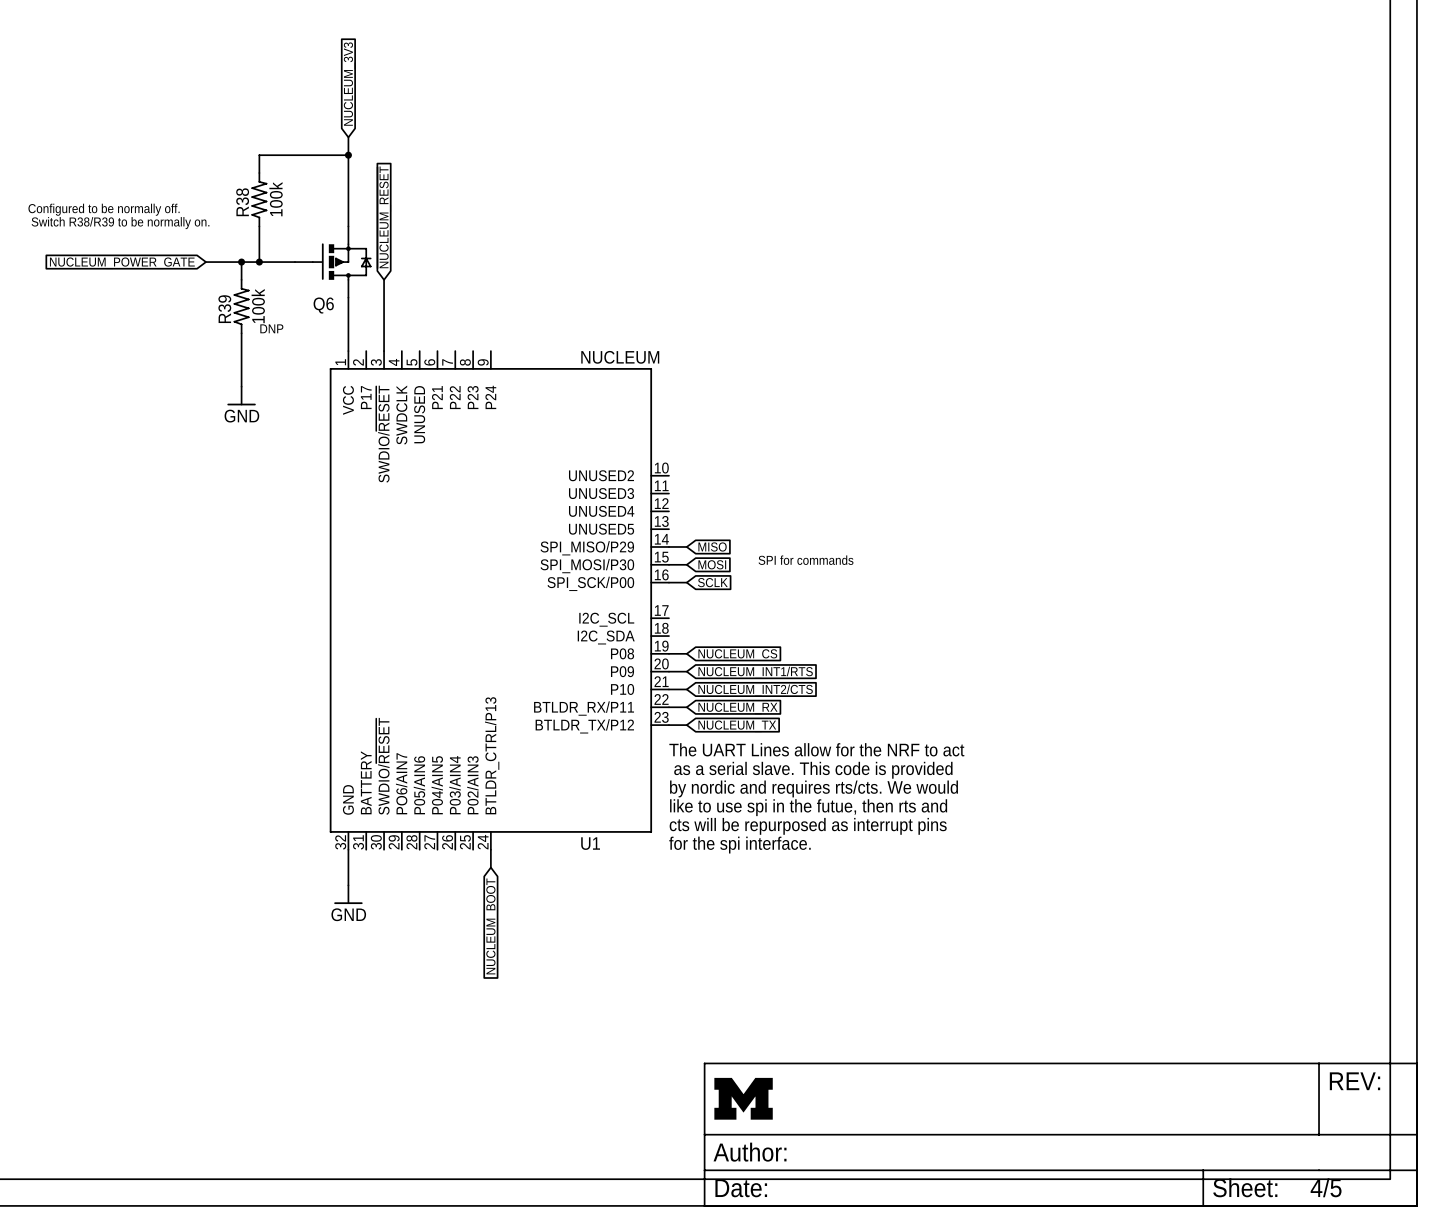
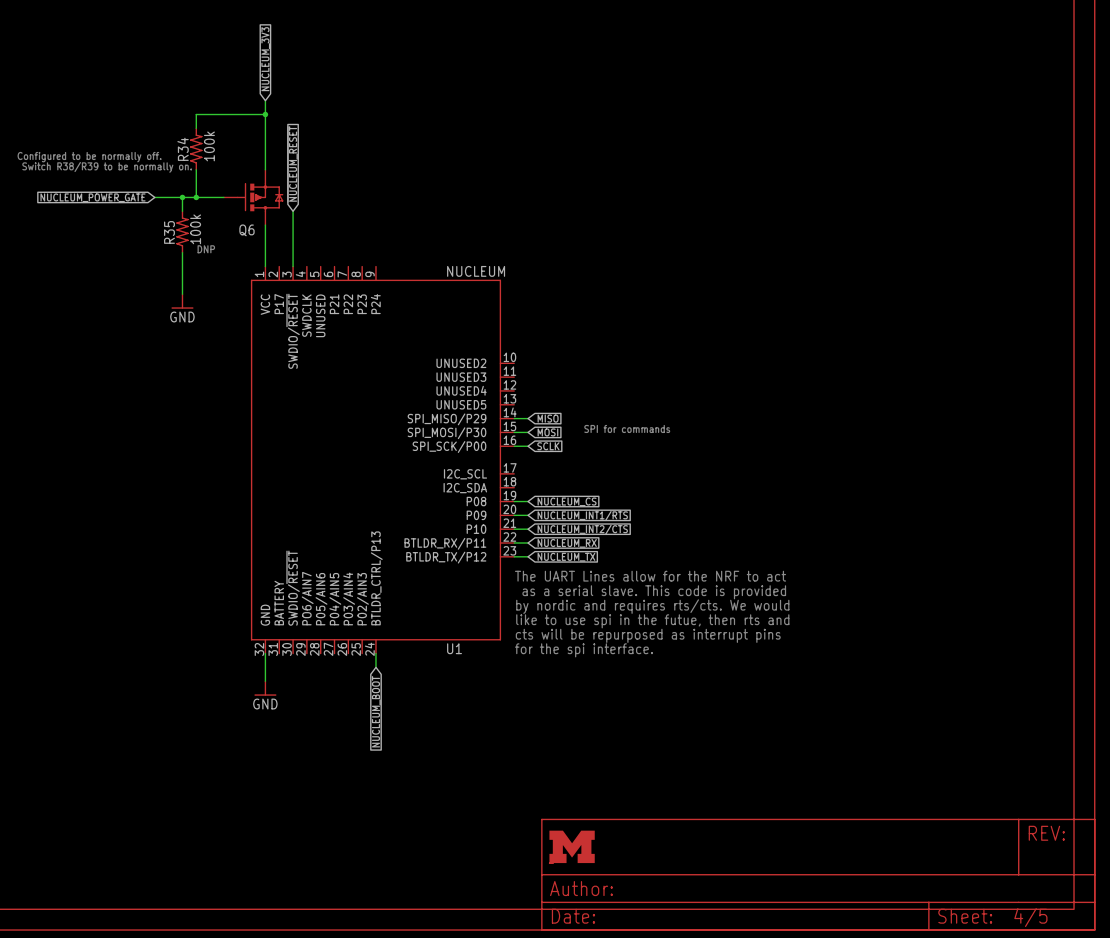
R38 name: R38 (242, 202) -> R34 (183, 149)
R39 name: R39 (224, 309) -> R35 (169, 232)

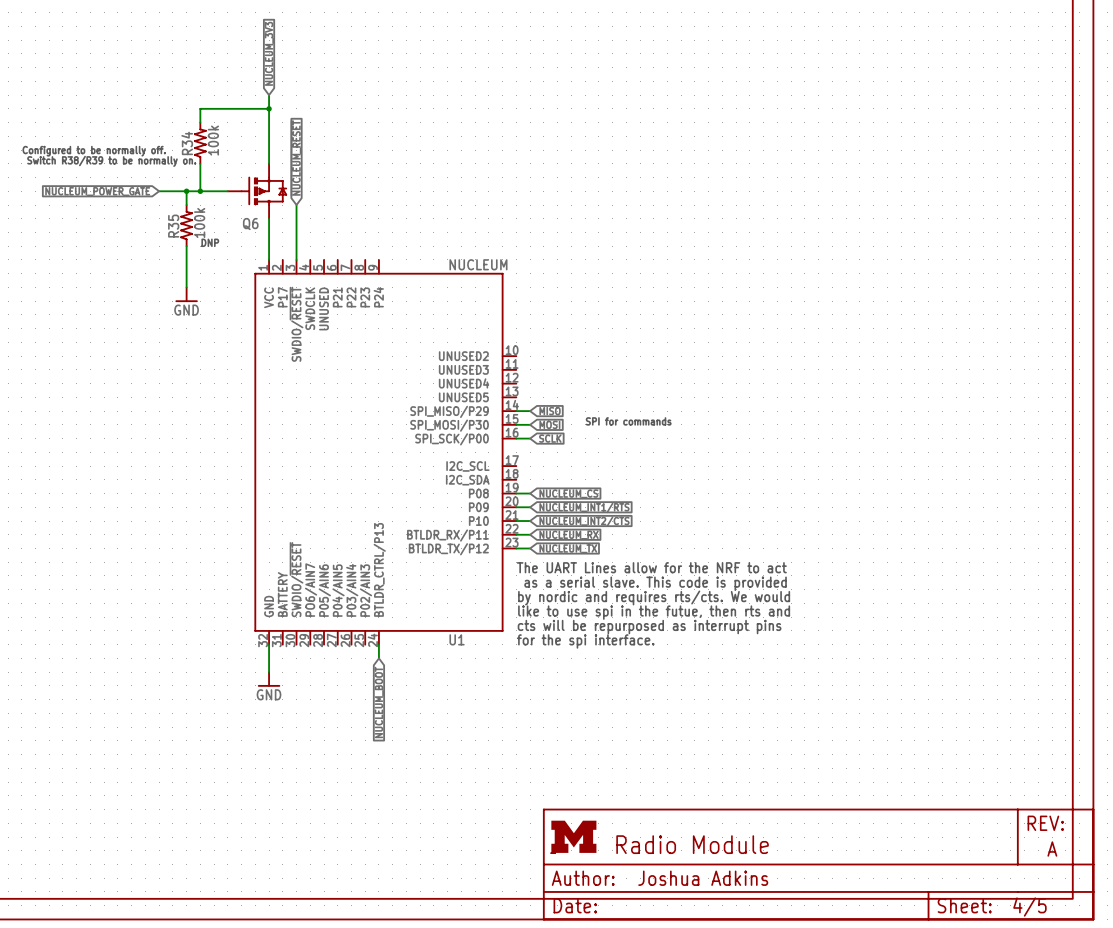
part text: none -> Radio Module (692, 844)
part text: none -> A (1052, 849)
part text: none -> Joshua Adkins (703, 878)

